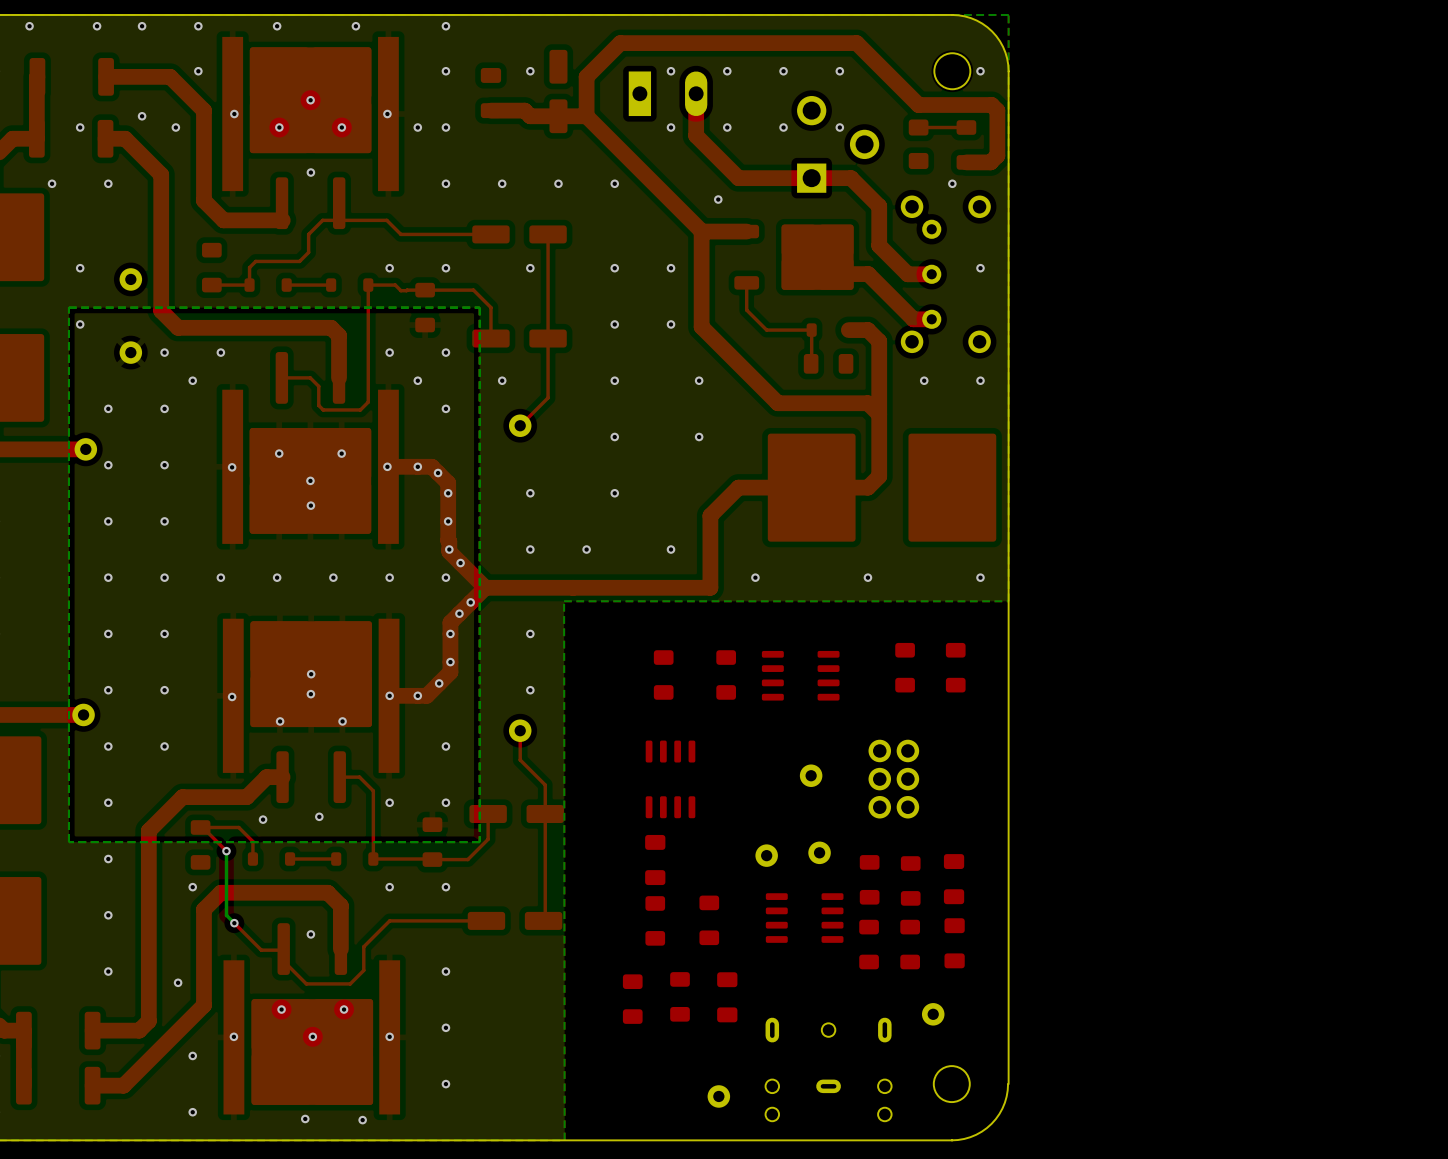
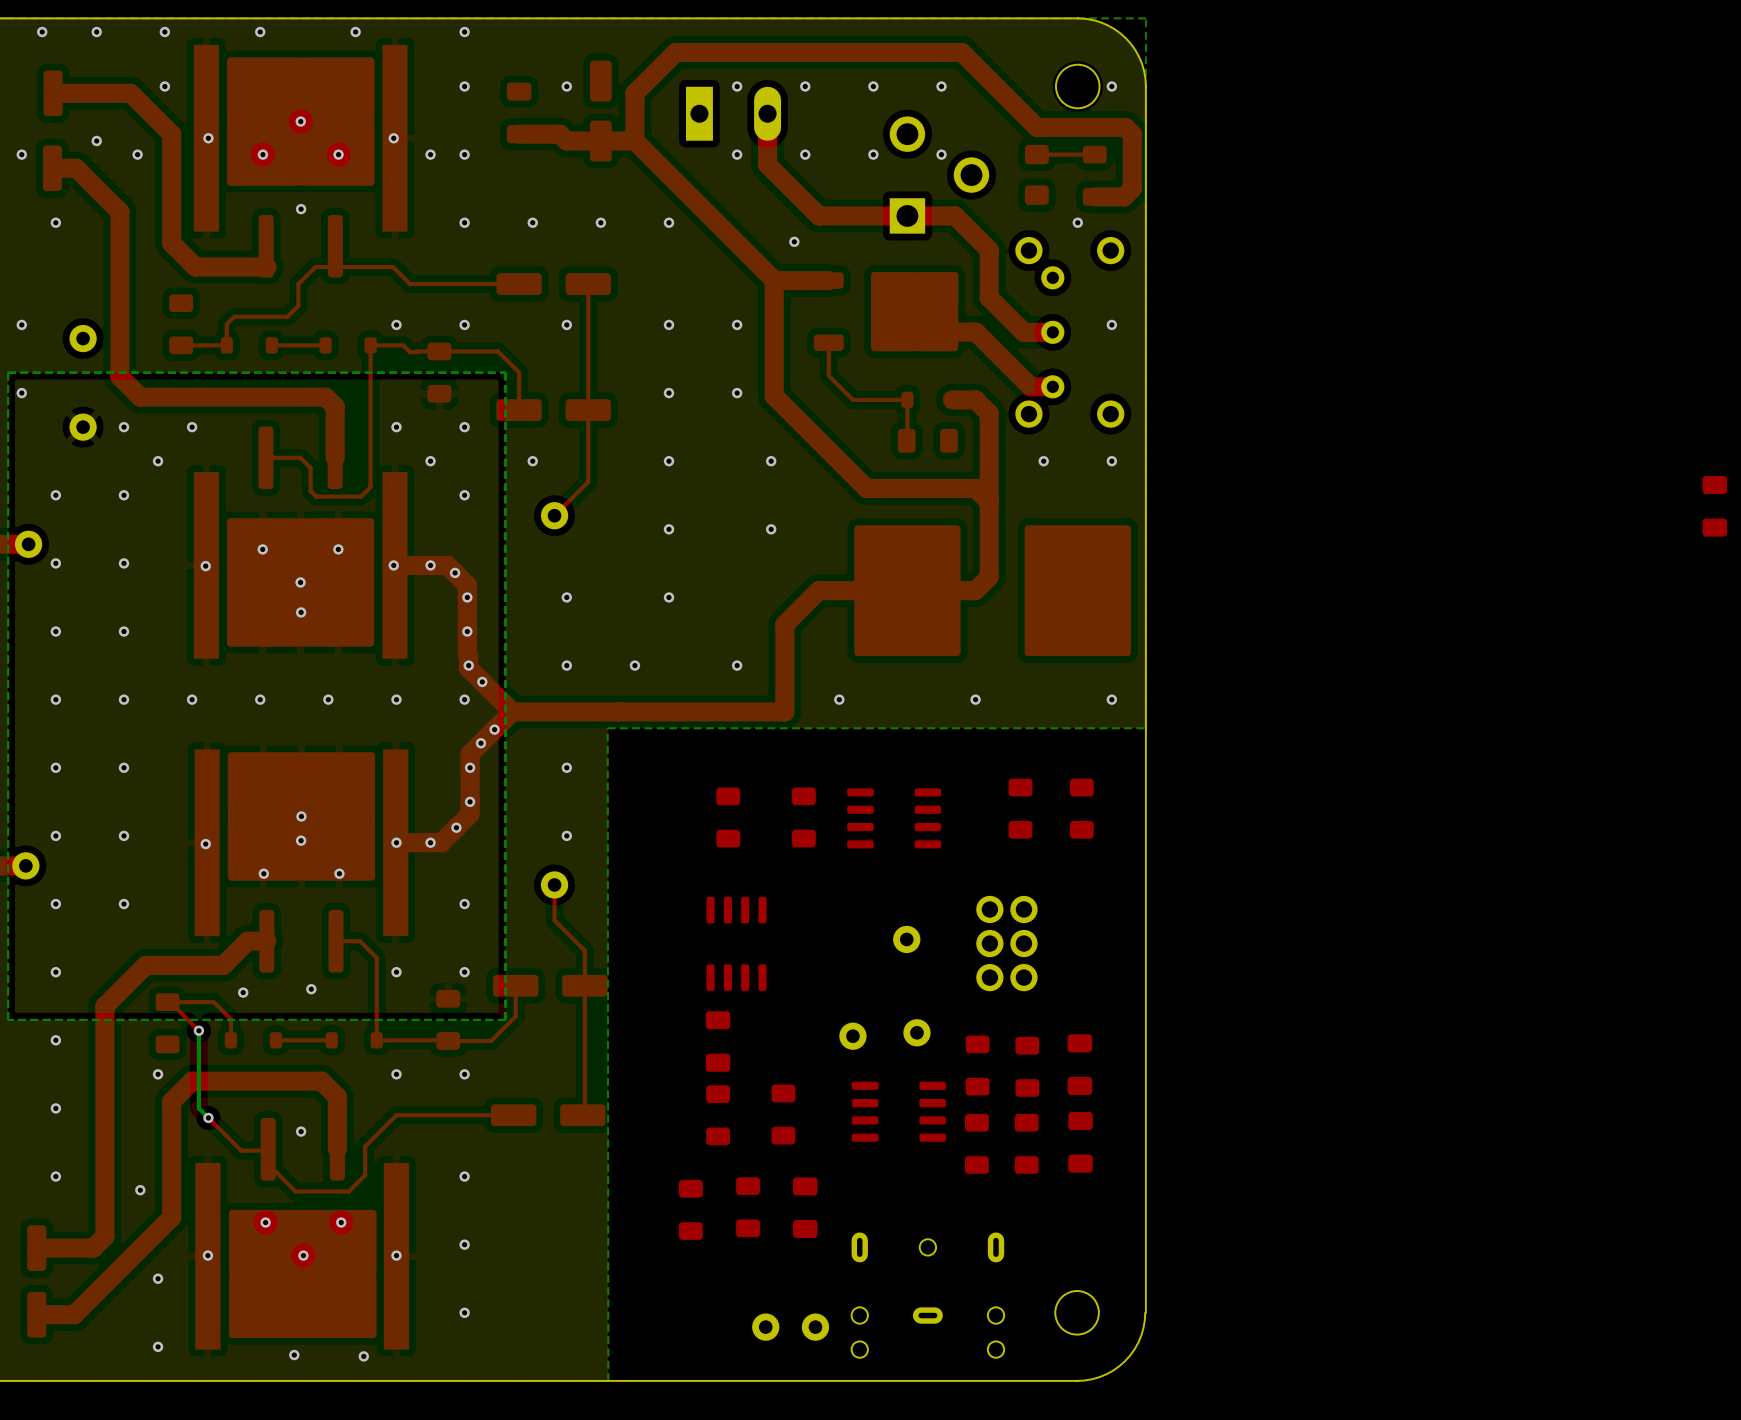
part: (933, 1014) -> none
part: none -> (765, 1327)
part: none -> (815, 1327)
part: (718, 1096) -> none

